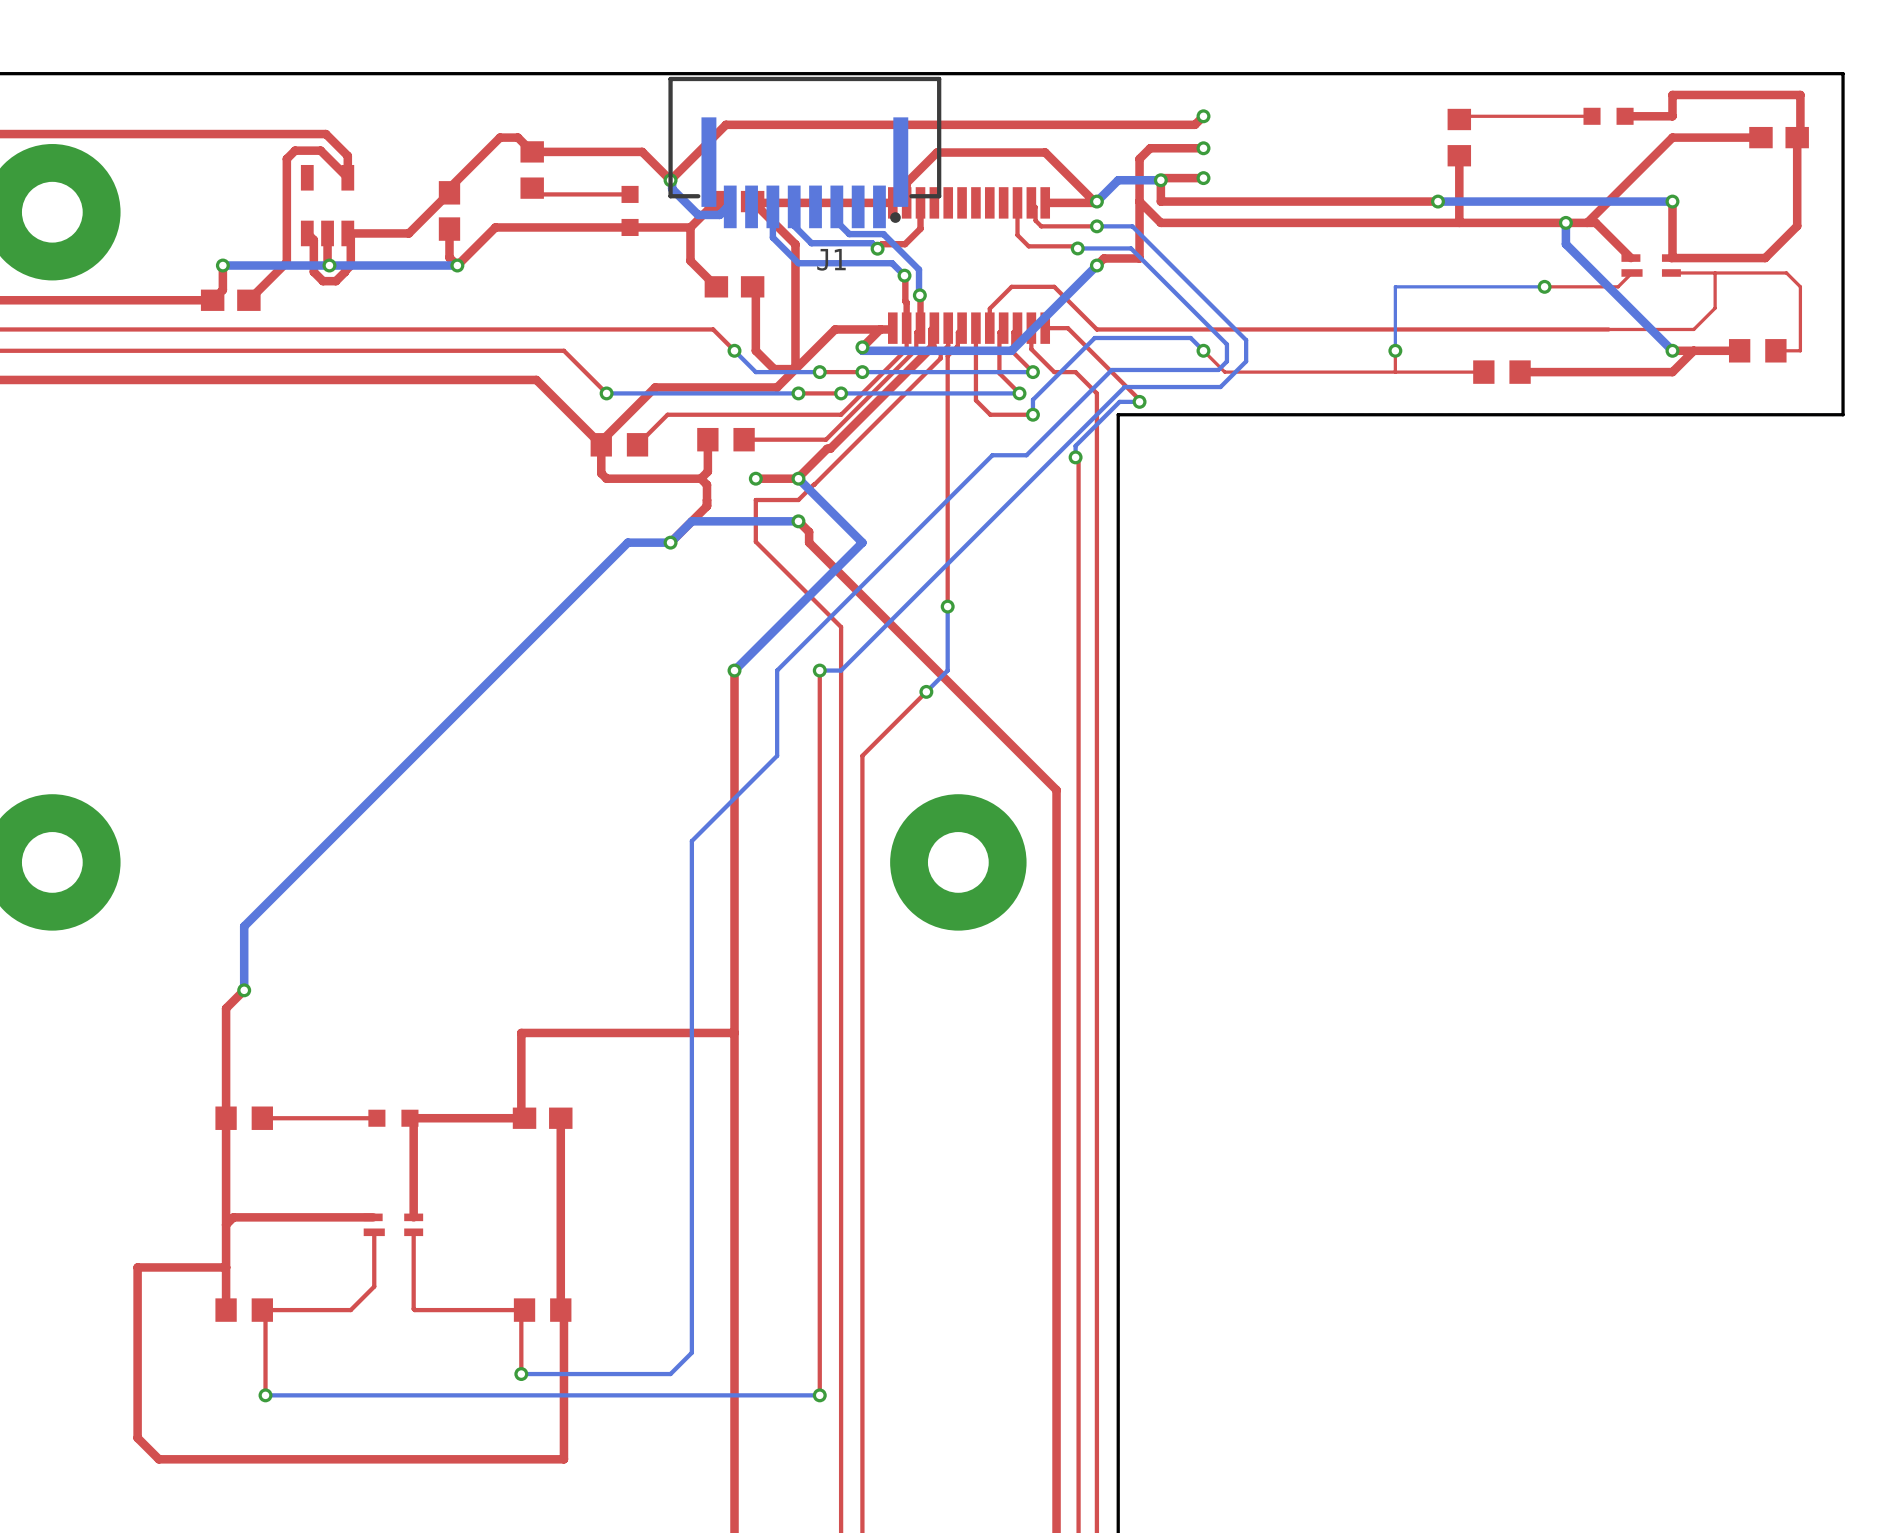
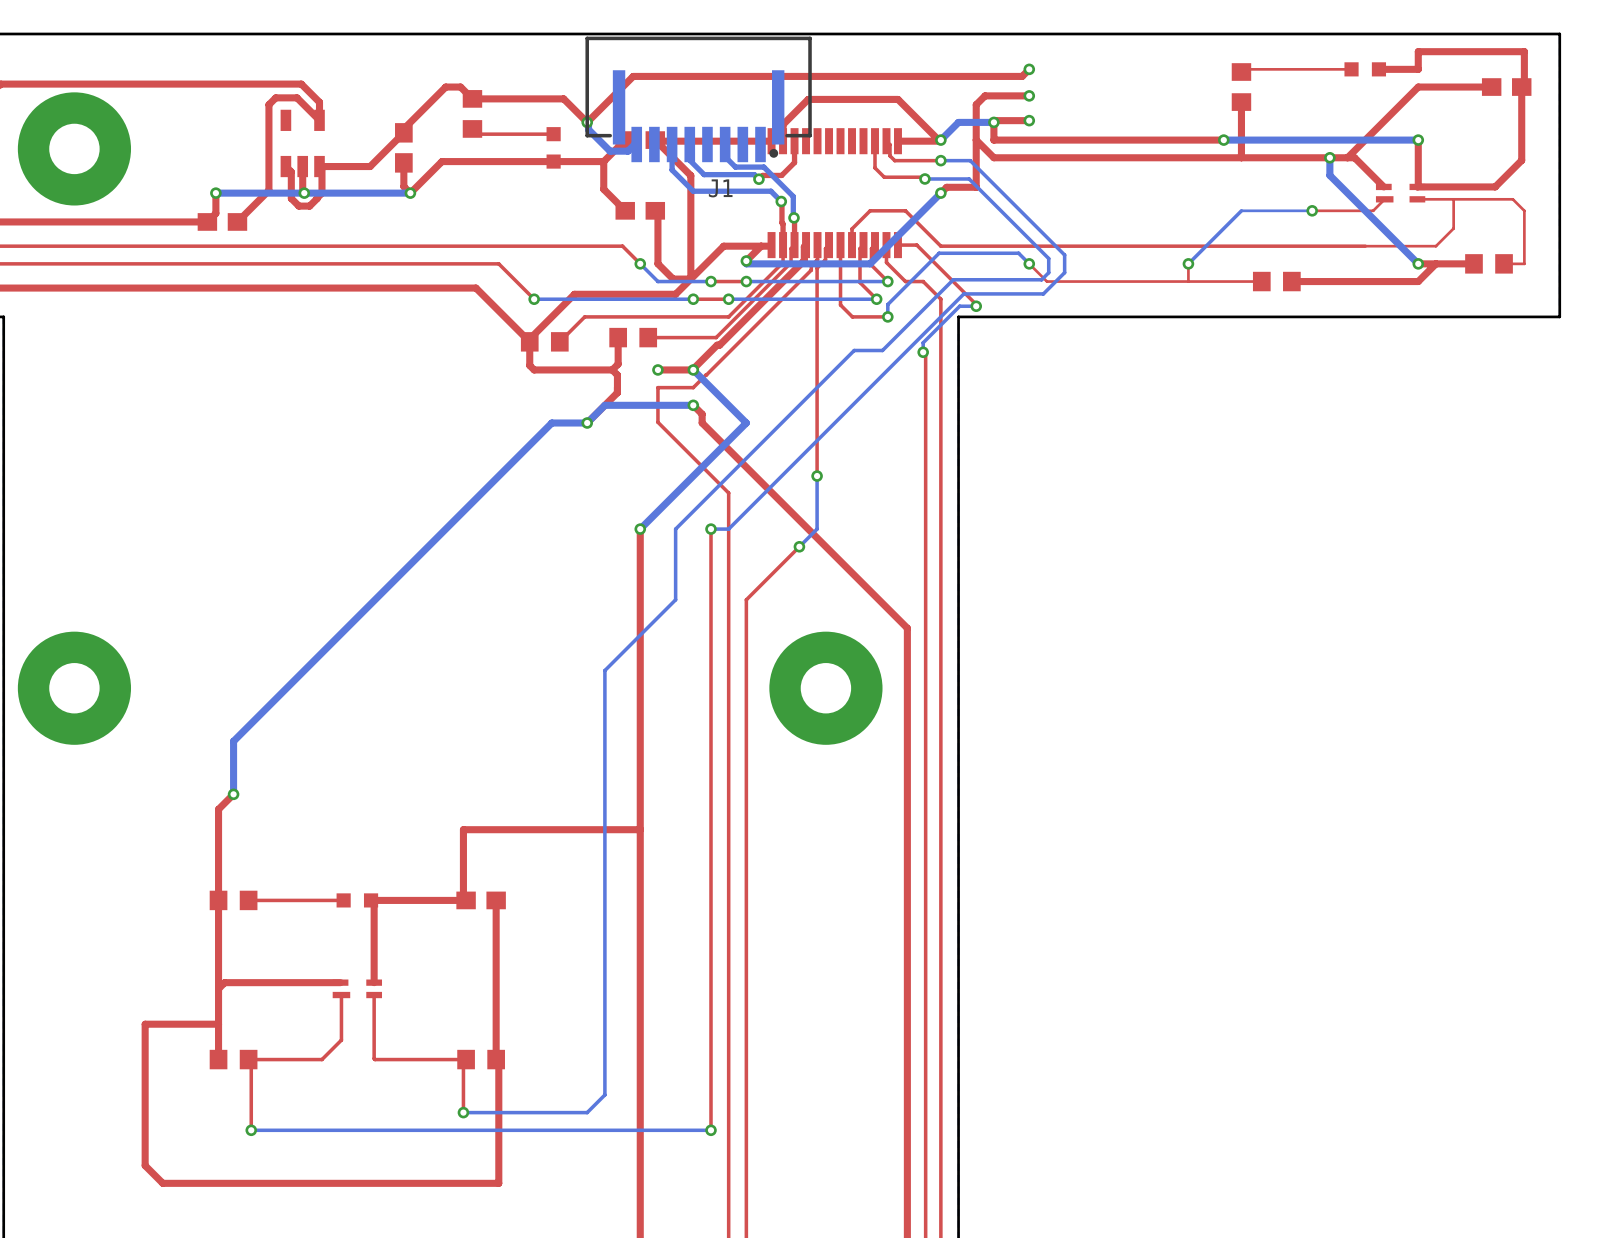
bottom track: (1459, 286) (1395, 286) (1395, 350) -> (1241, 210) (1188, 263)

